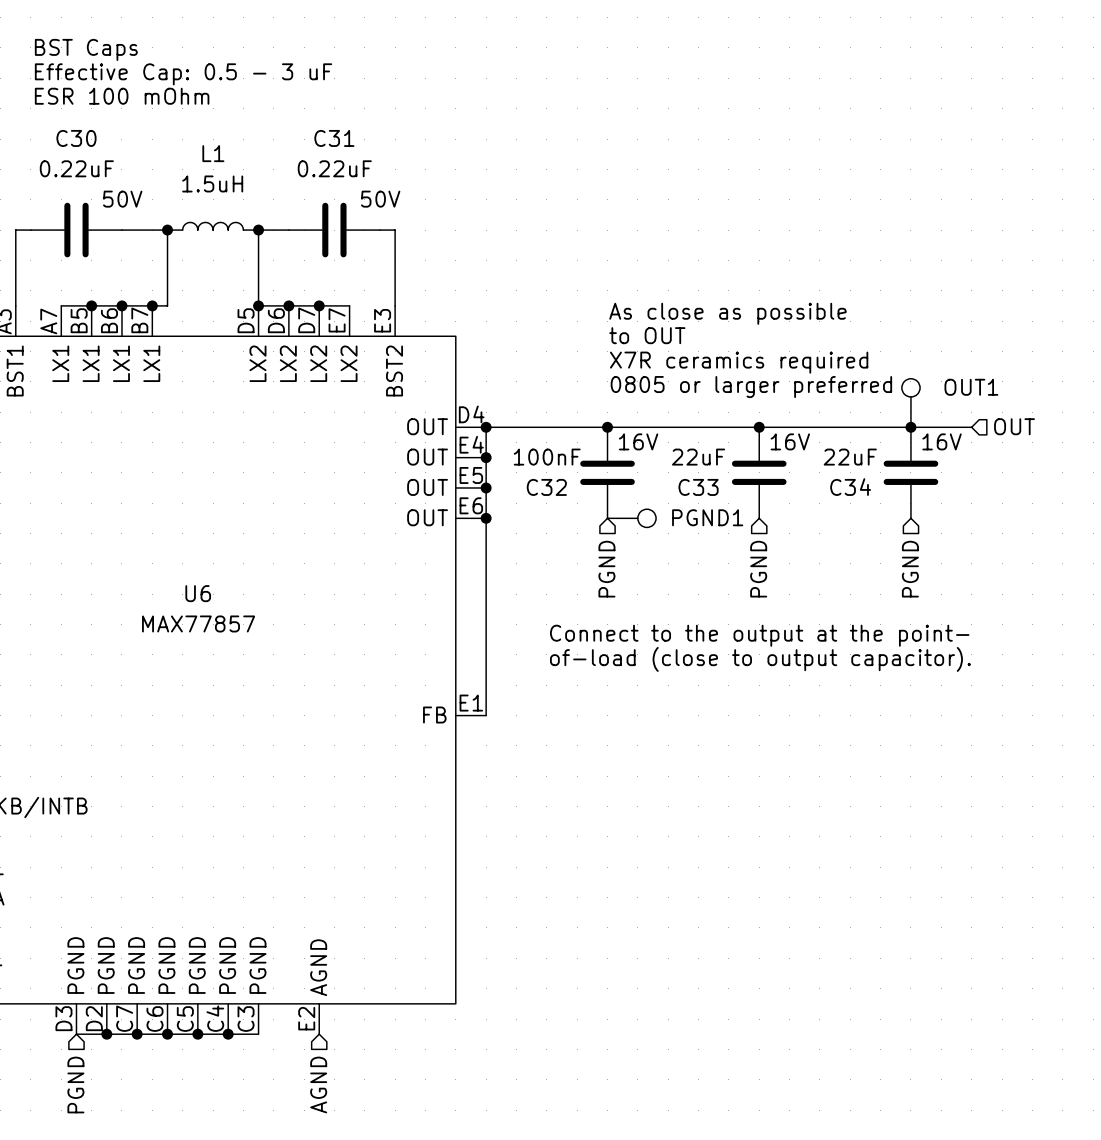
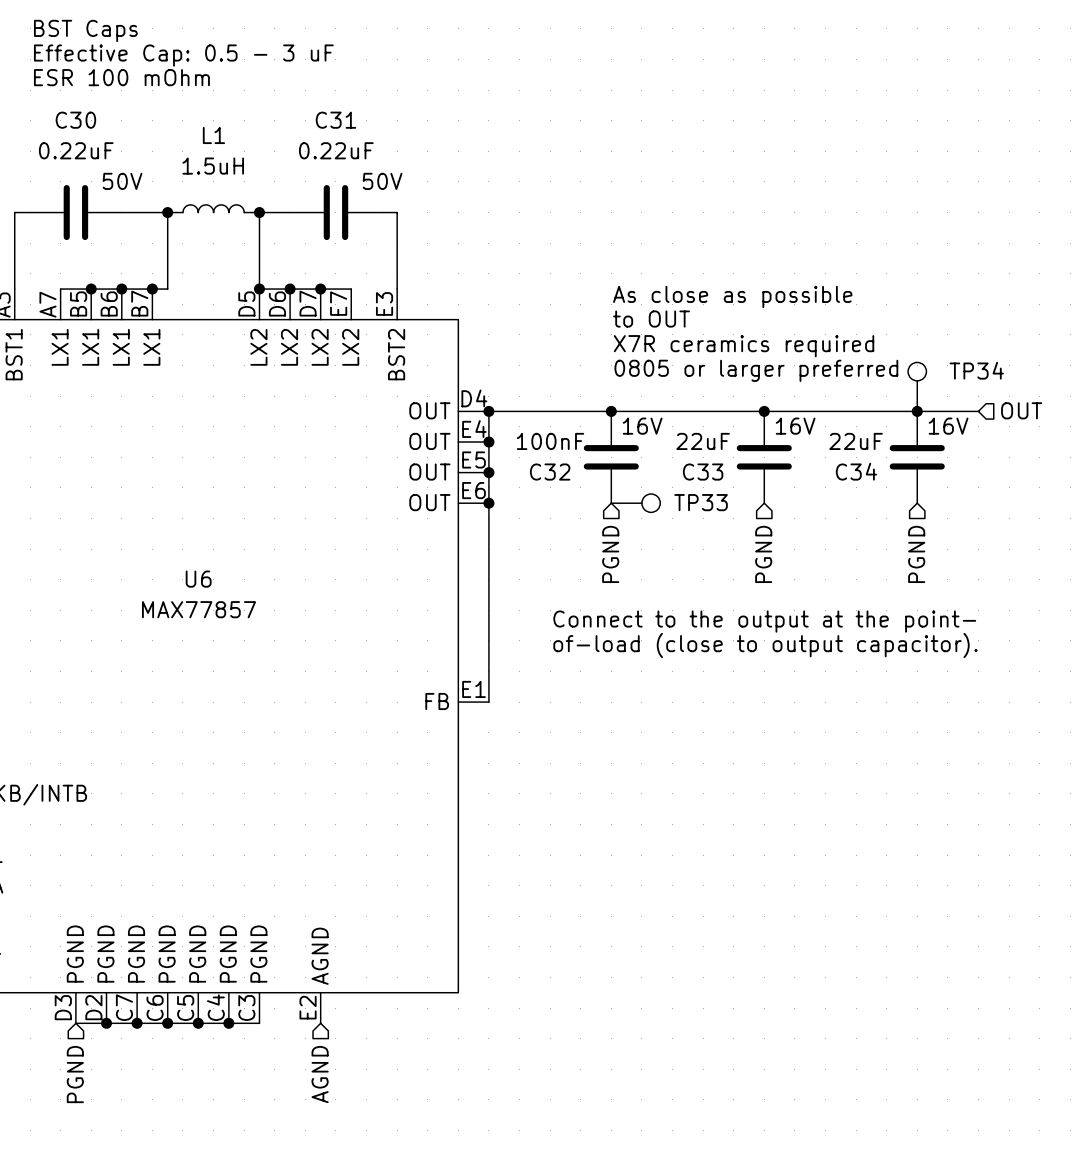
OUT1 name: OUT1 (971, 387) -> TP34 (976, 370)
PGND1 name: PGND1 (707, 517) -> TP33 (701, 502)

